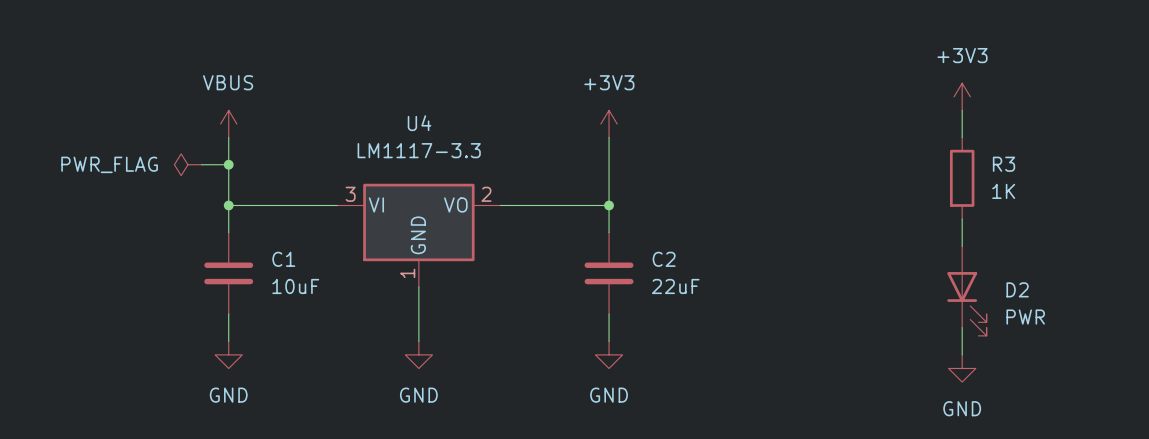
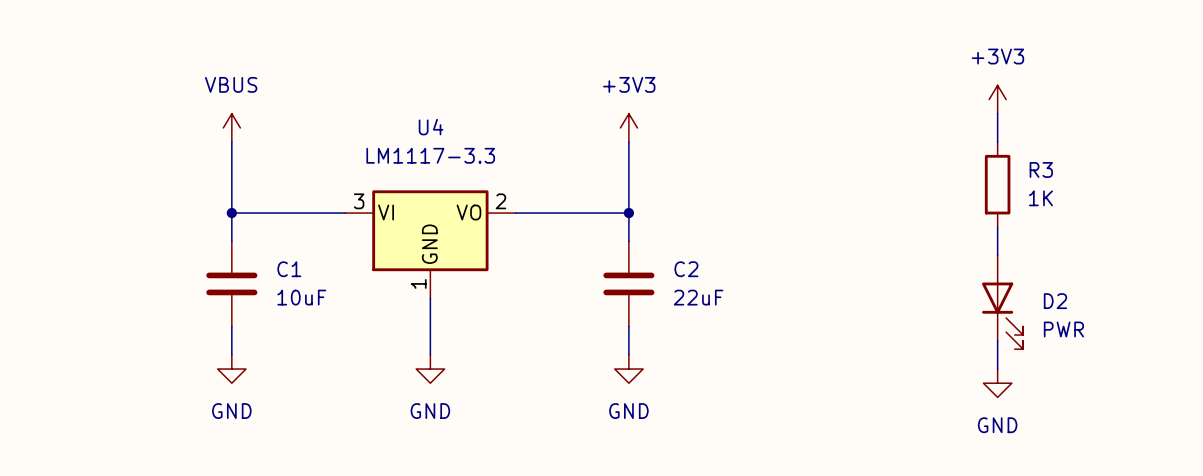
power symbol: PWR_FLAG (187, 164) -> none
wire: (201, 164) (228, 164) -> none
junction: (228, 164) -> none

